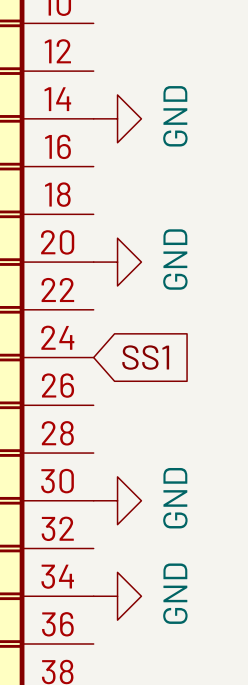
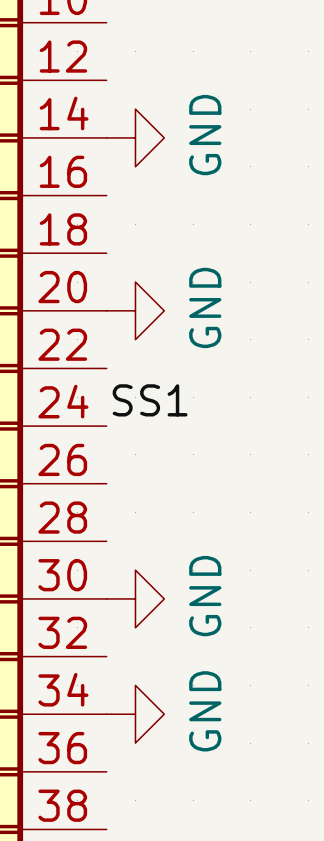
label: none -> SS1 (150, 400)
global label: SS1 (145, 357) -> none

